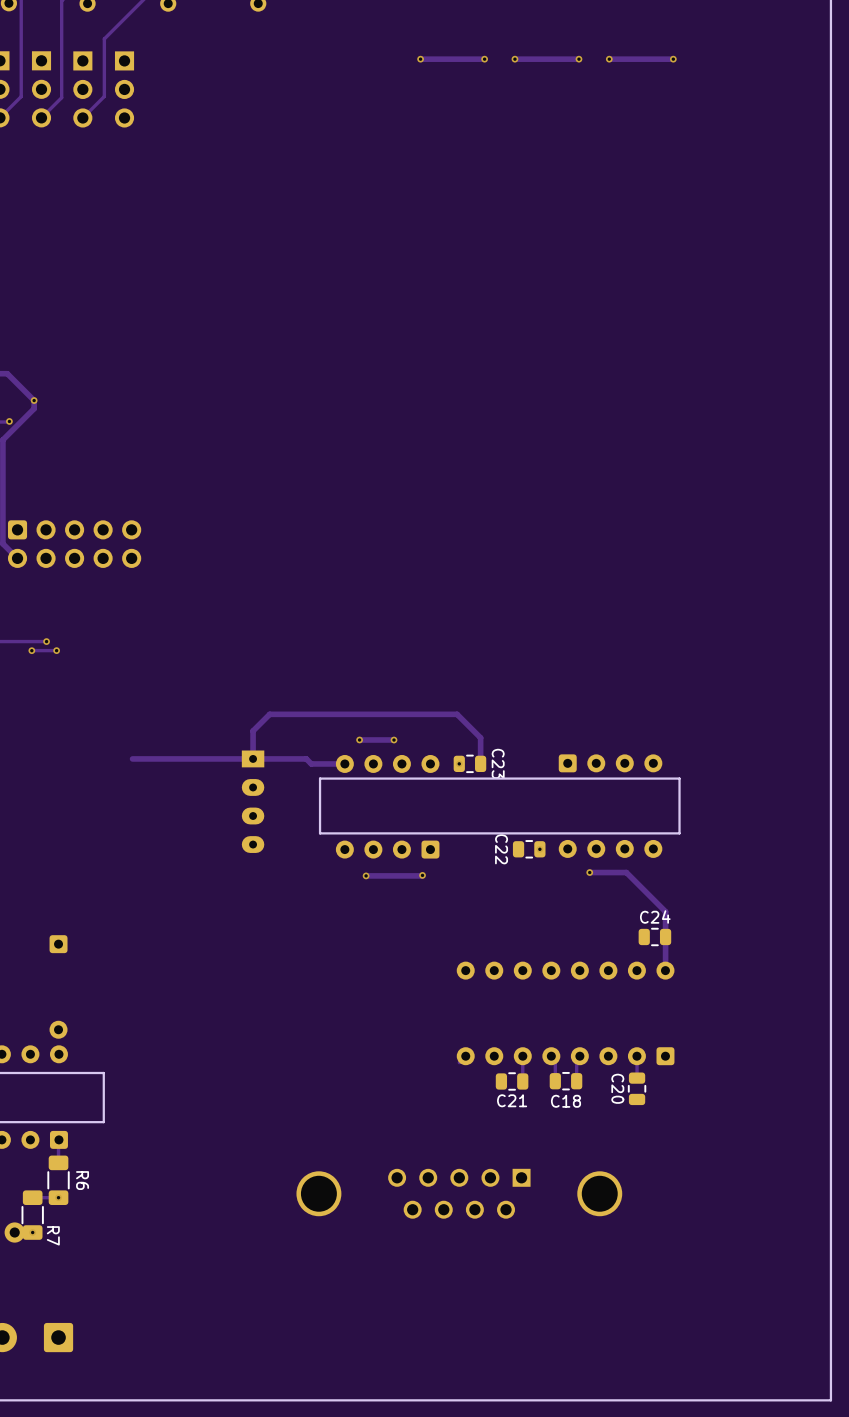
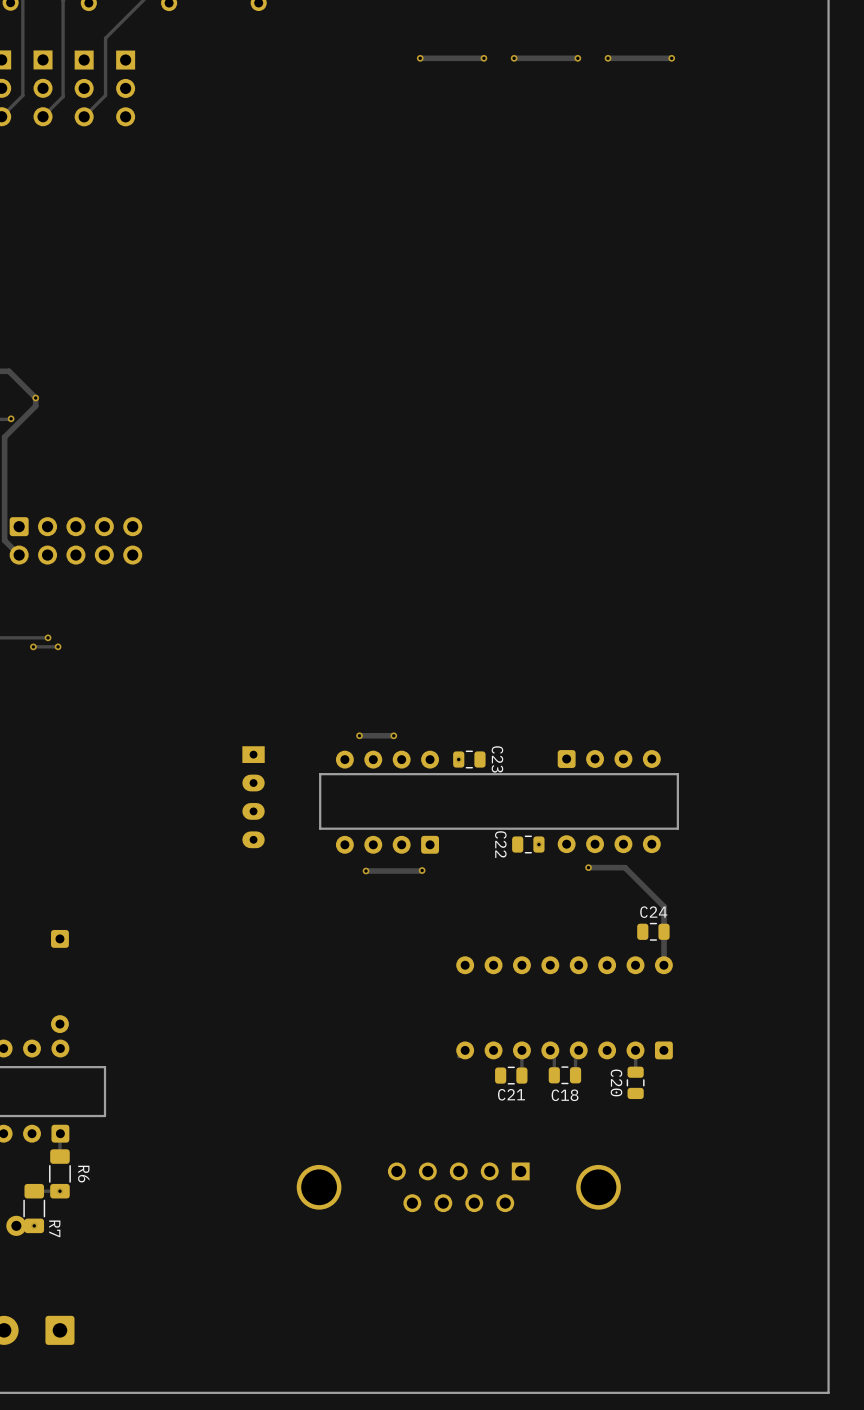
track: (132, 758) (306, 758) (311, 763) (344, 763) -> none
track: (253, 758) (253, 730) (269, 714) (457, 714) (480, 737) (480, 763) -> none

